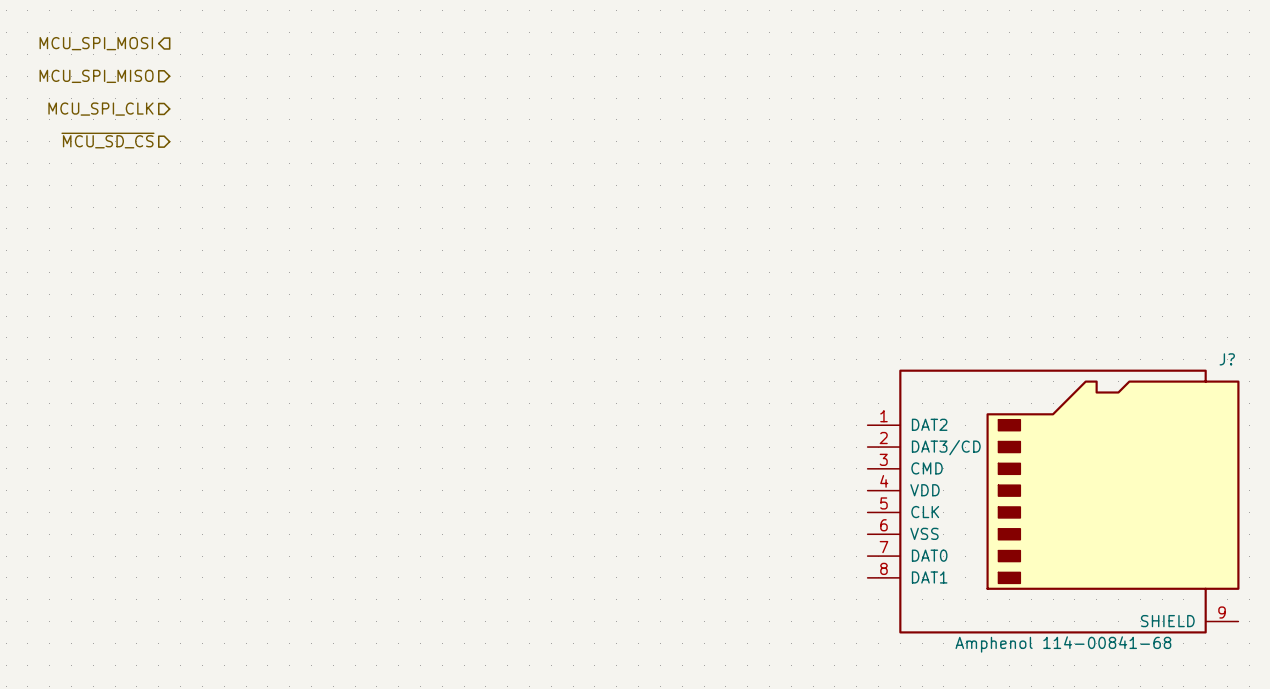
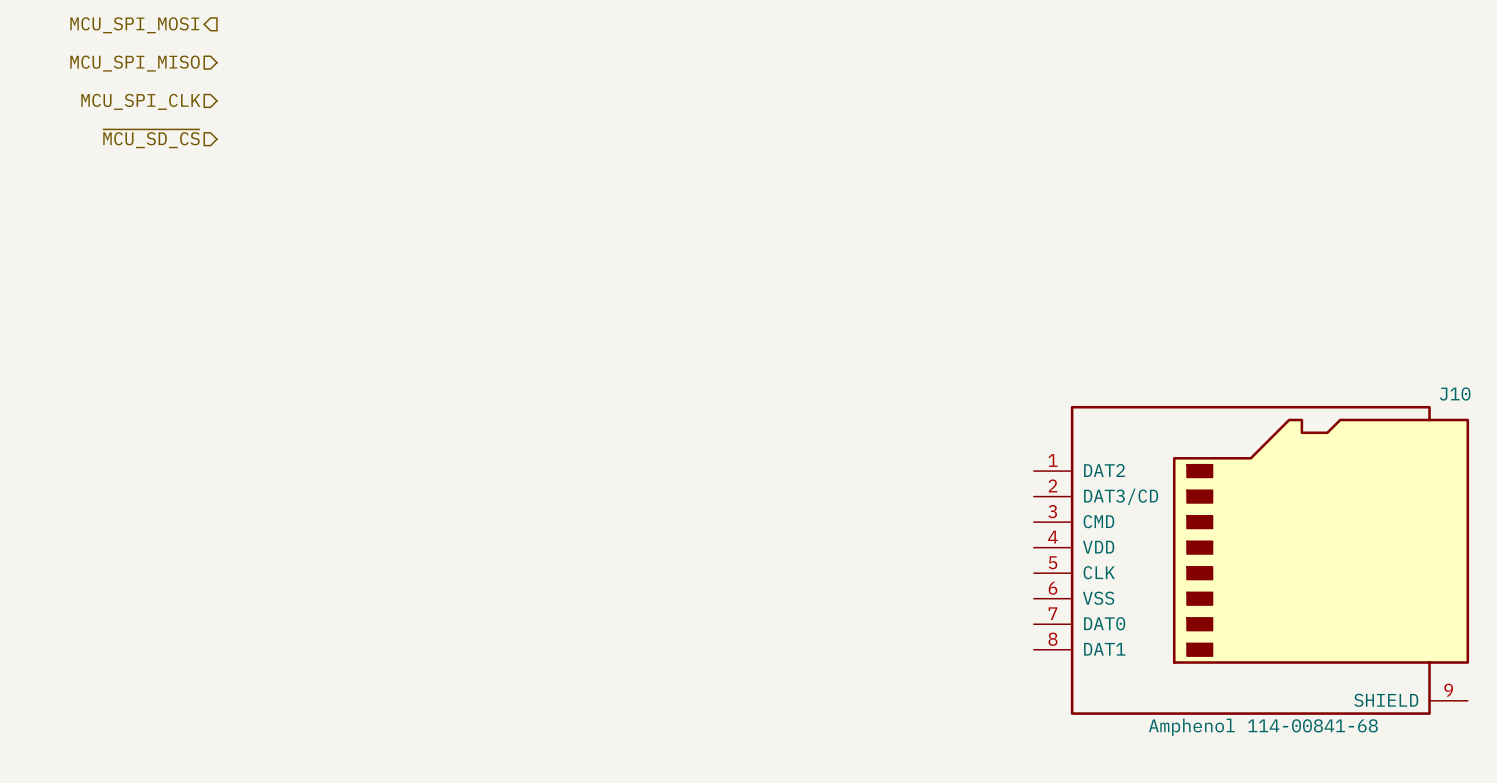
J? name: J? (1227, 359) -> J10 (1455, 394)

